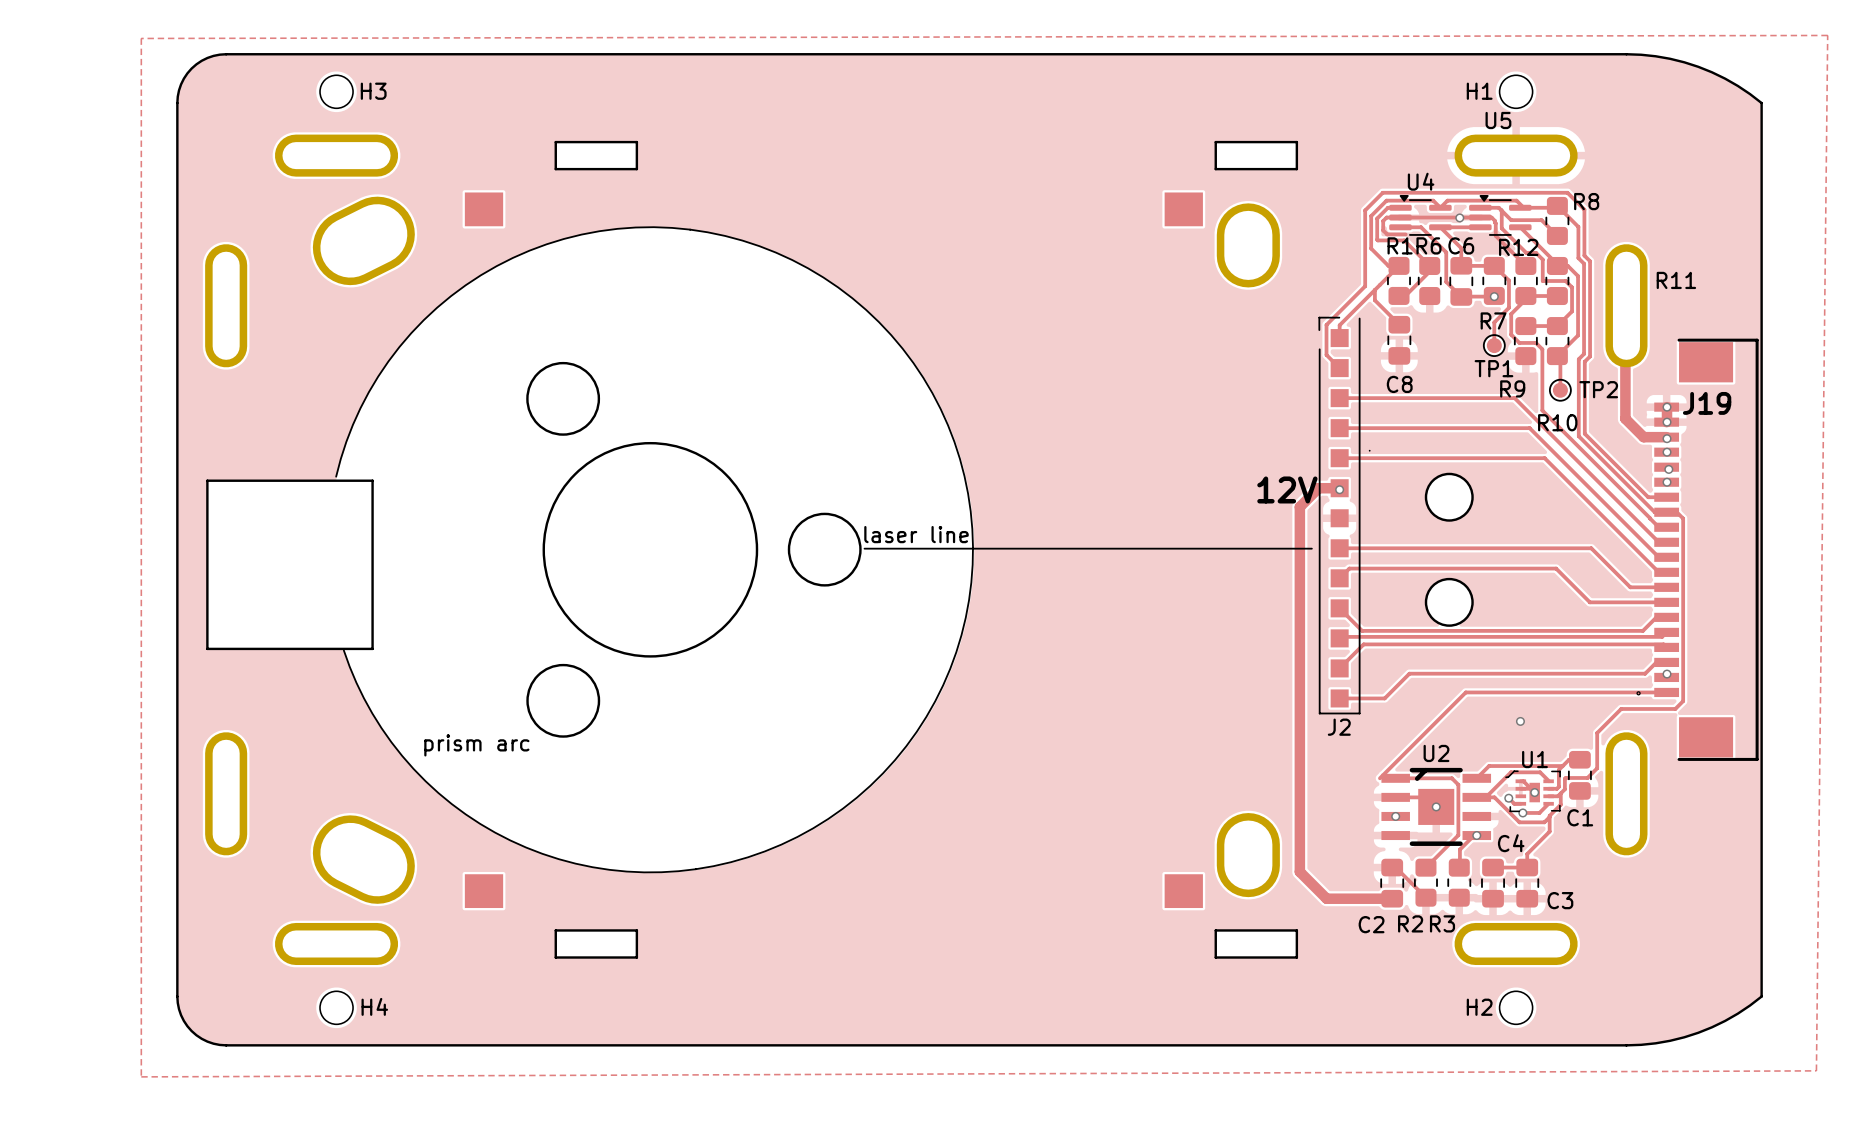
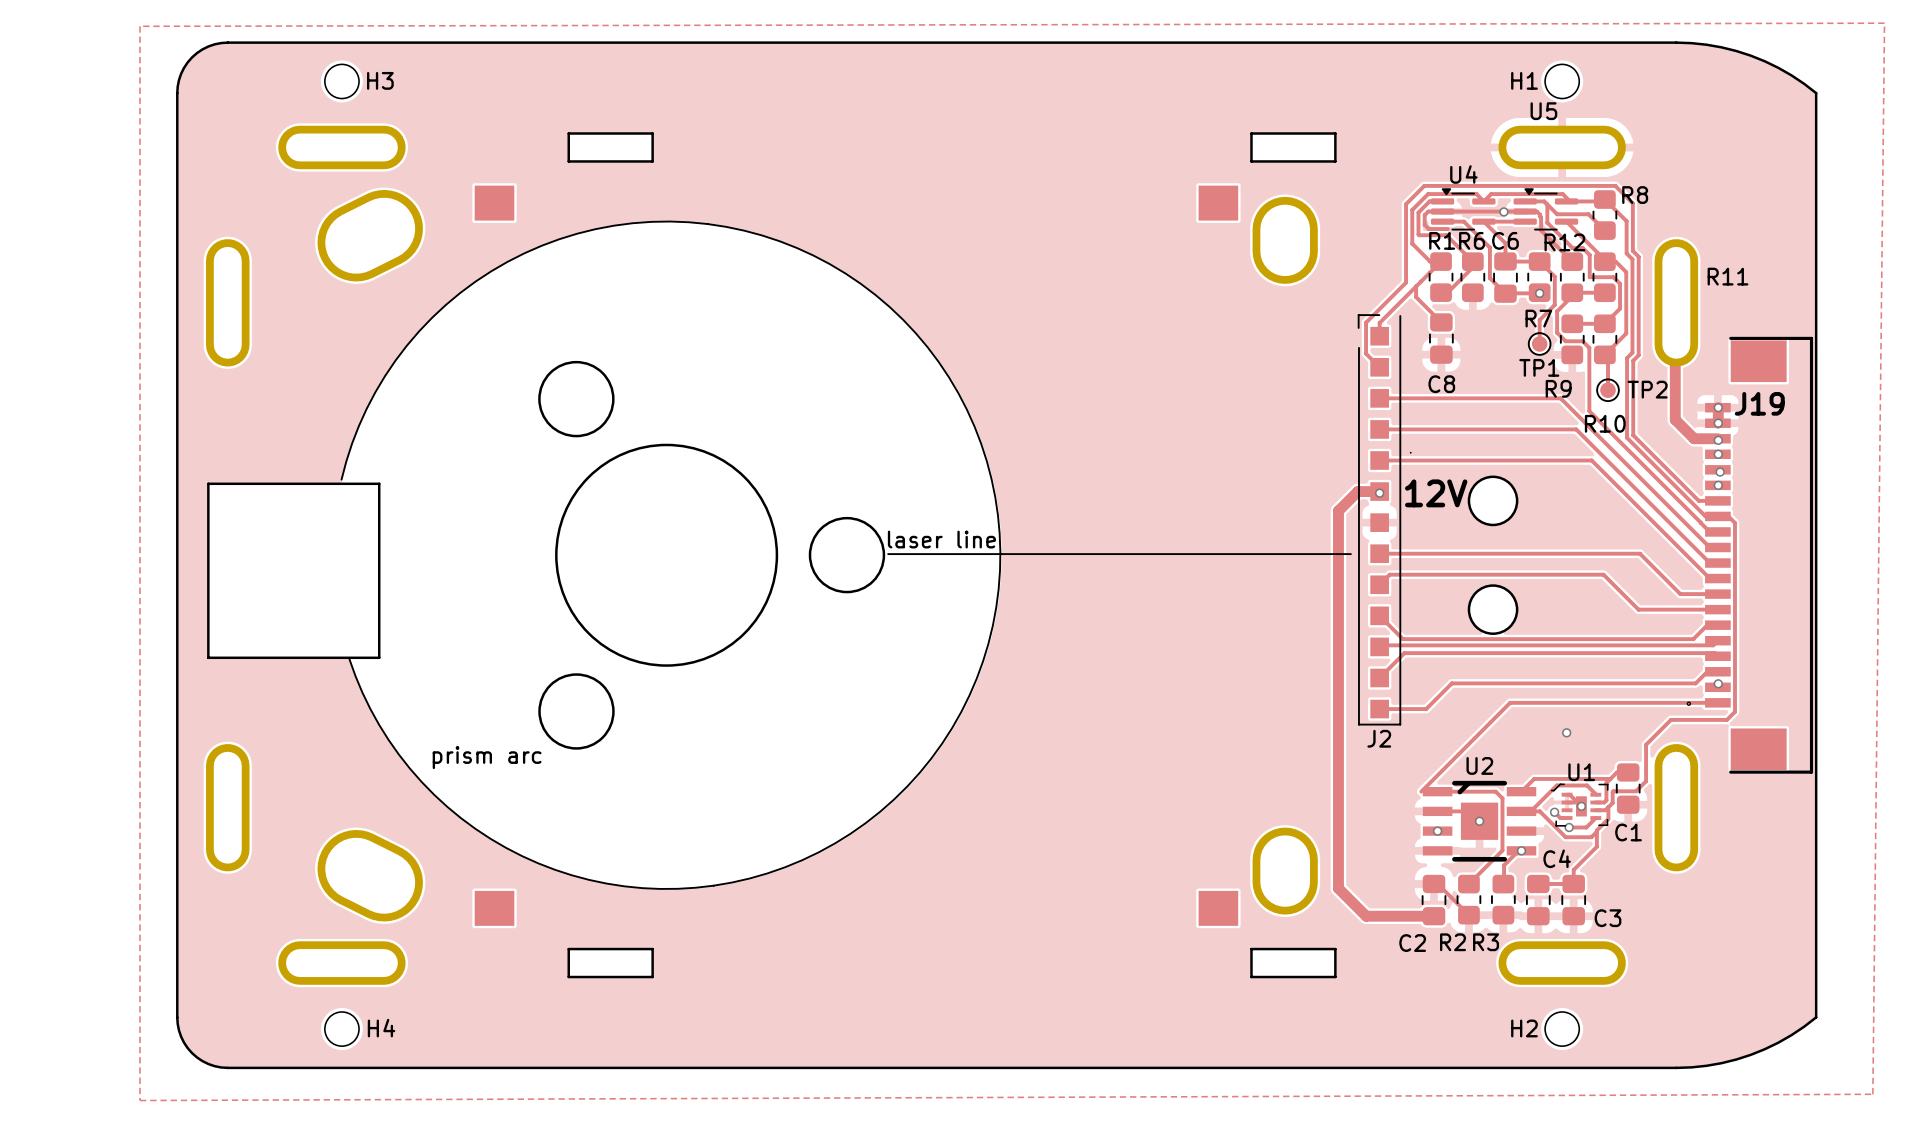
text position: 12V (1287, 489) -> 12V (1436, 493)

